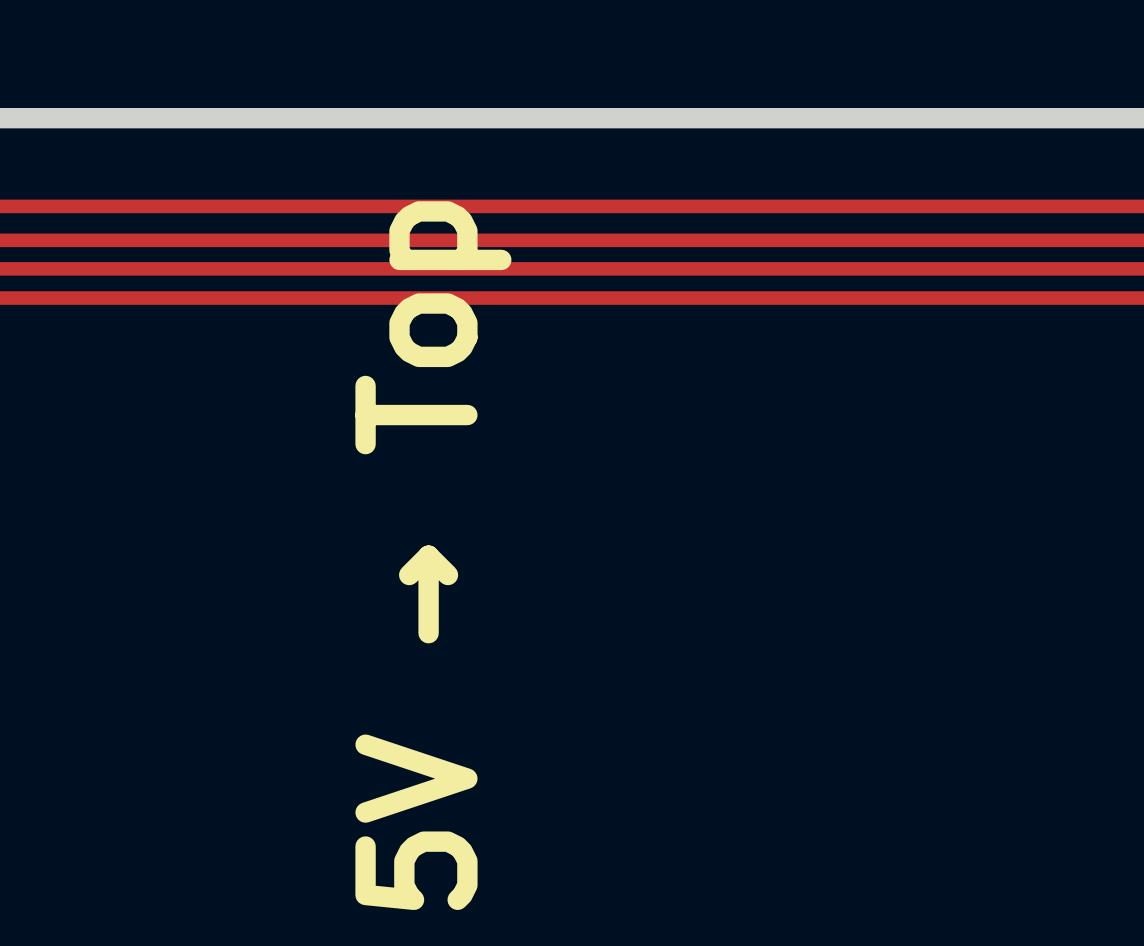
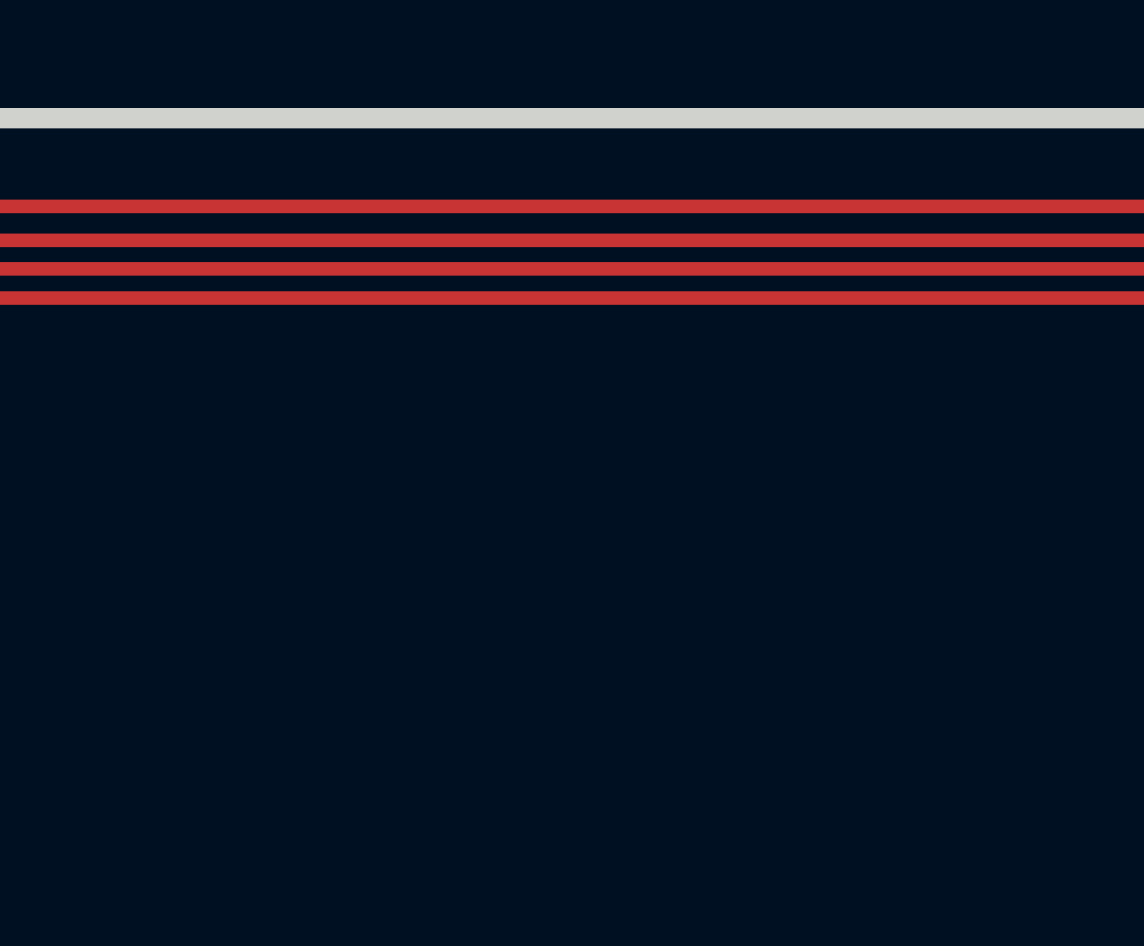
text: 5V → Top (433, 555) -> none

